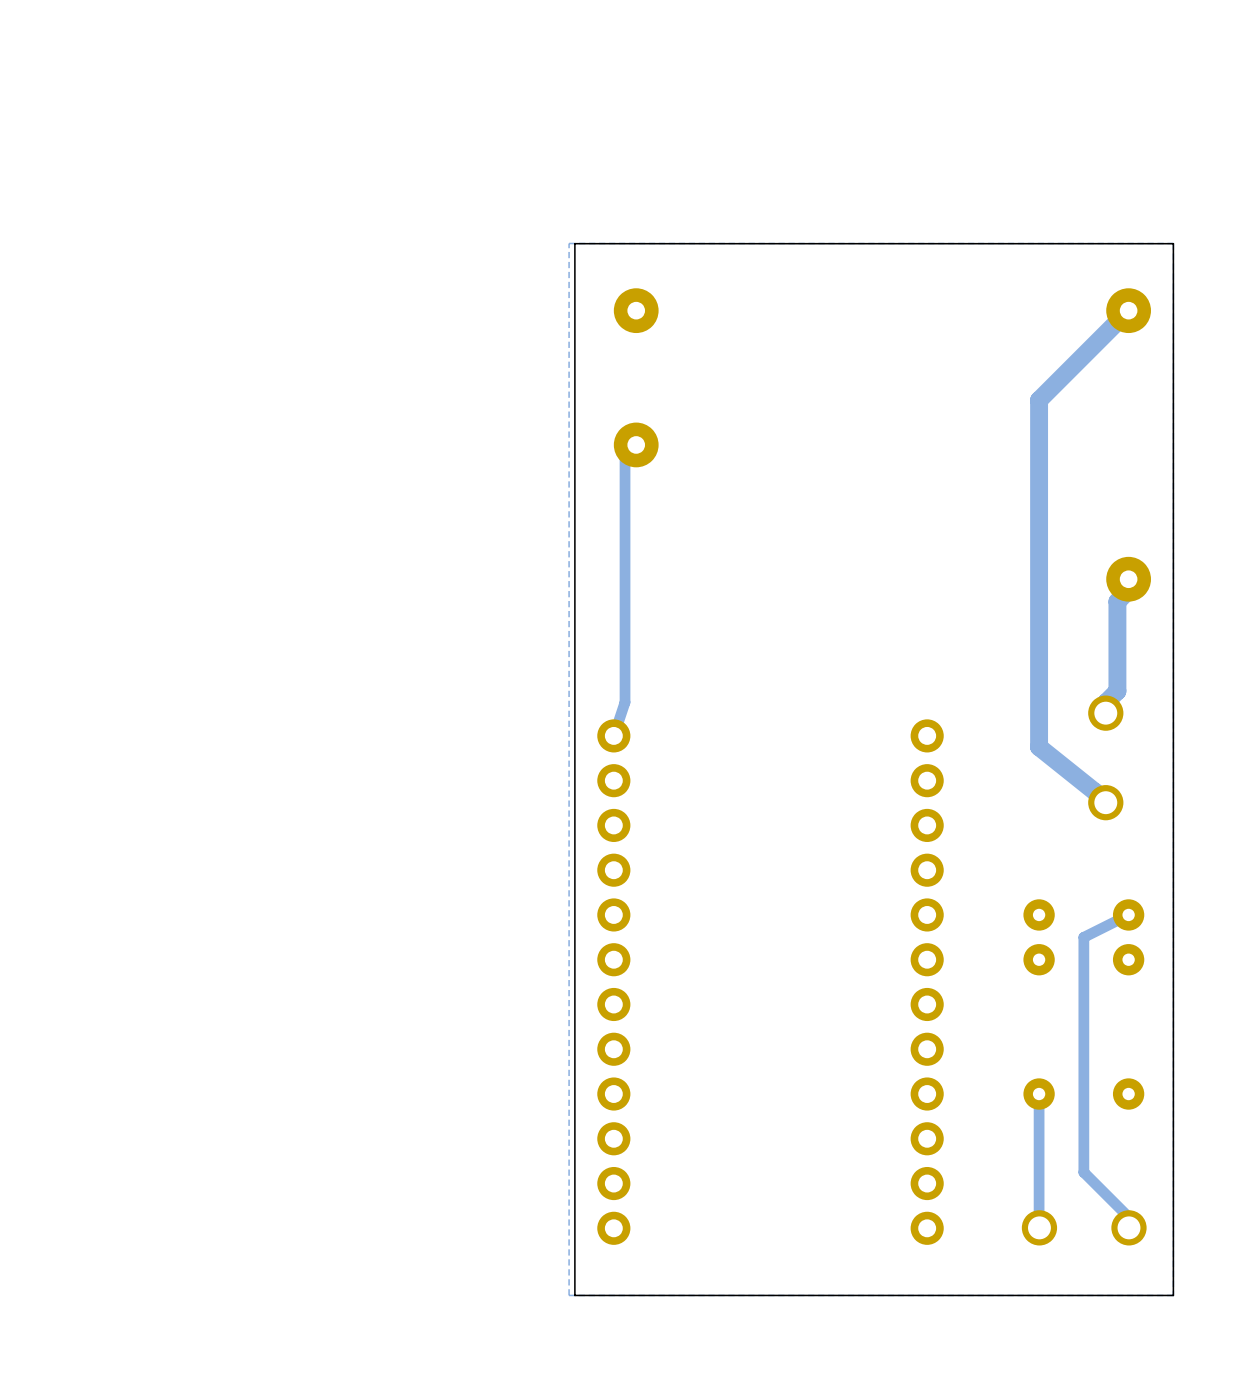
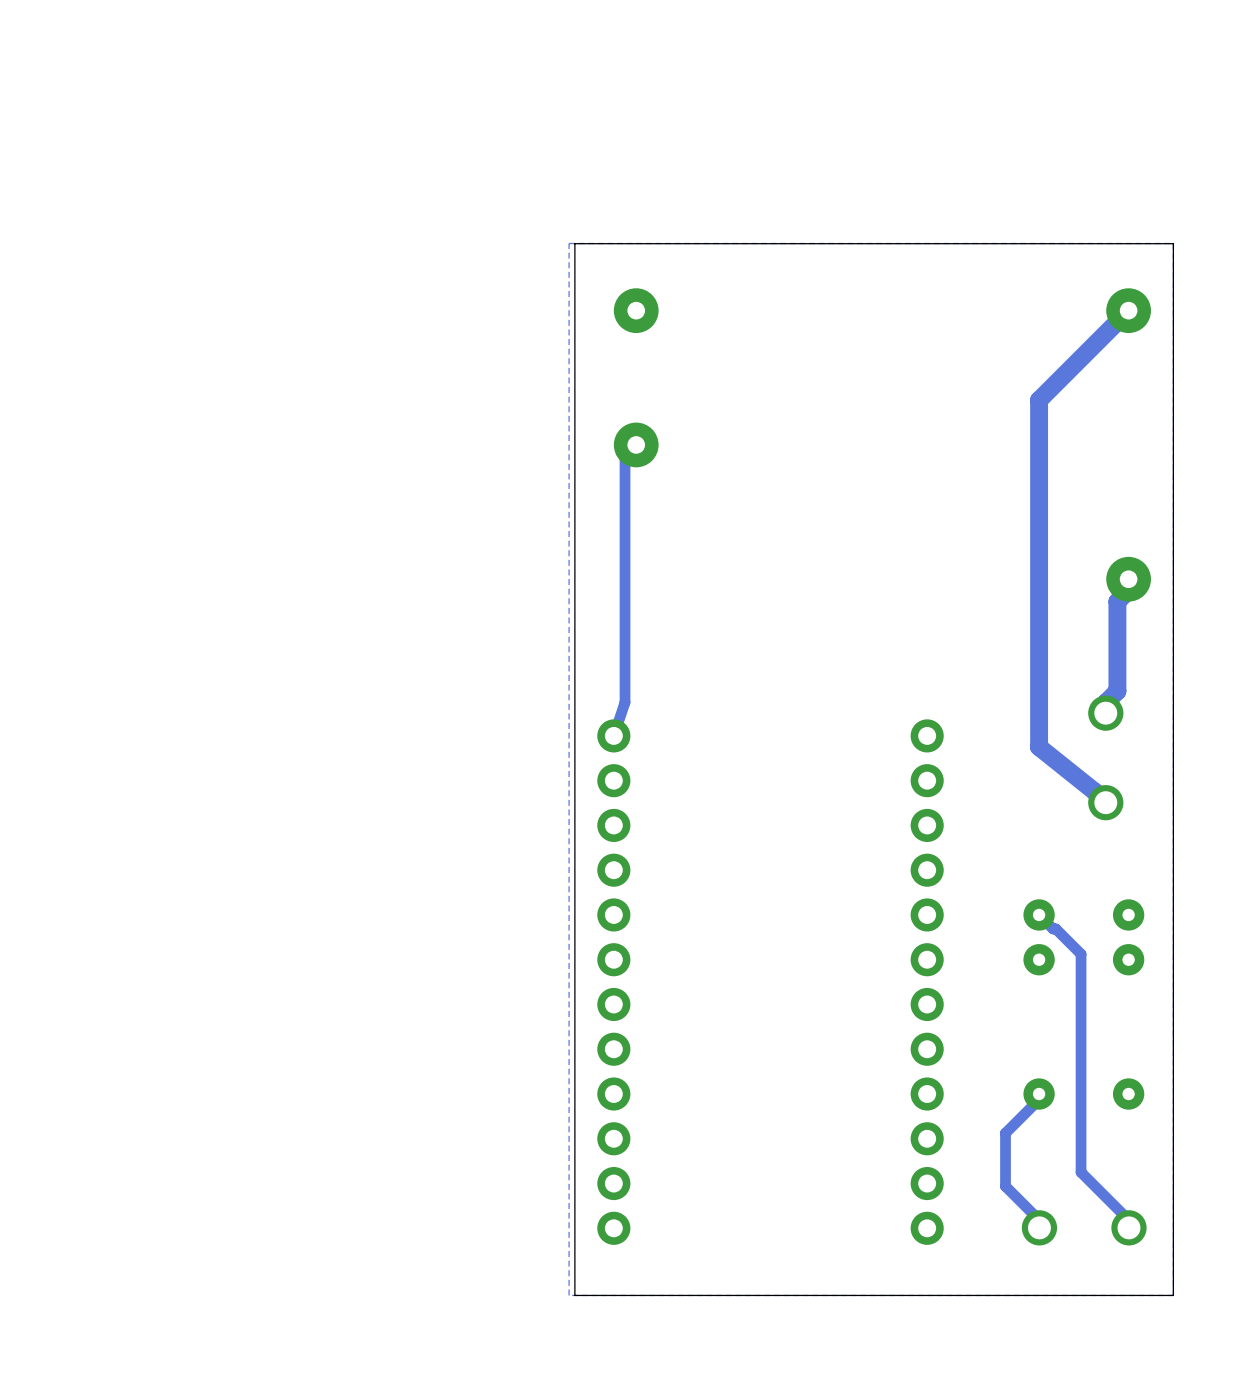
track: (1128, 914) (1083, 937) (1083, 1172) (1128, 1217) (1128, 1227) -> (1039, 914) (1081, 954) (1081, 1172) (1128, 1219) (1128, 1227)
track: (1039, 1099) (1039, 1227) -> (1039, 1099) (1005, 1133) (1005, 1186) (1039, 1219) (1039, 1227)

